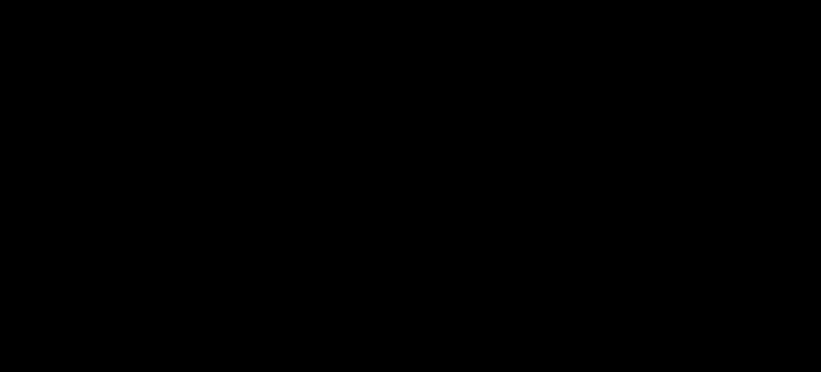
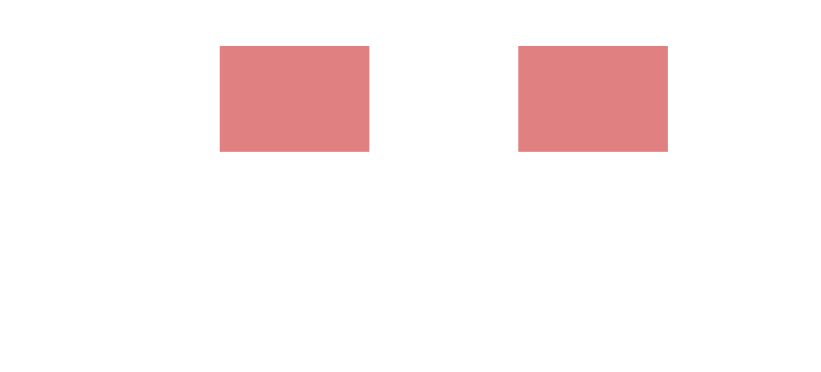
part: none -> (443, 98)

